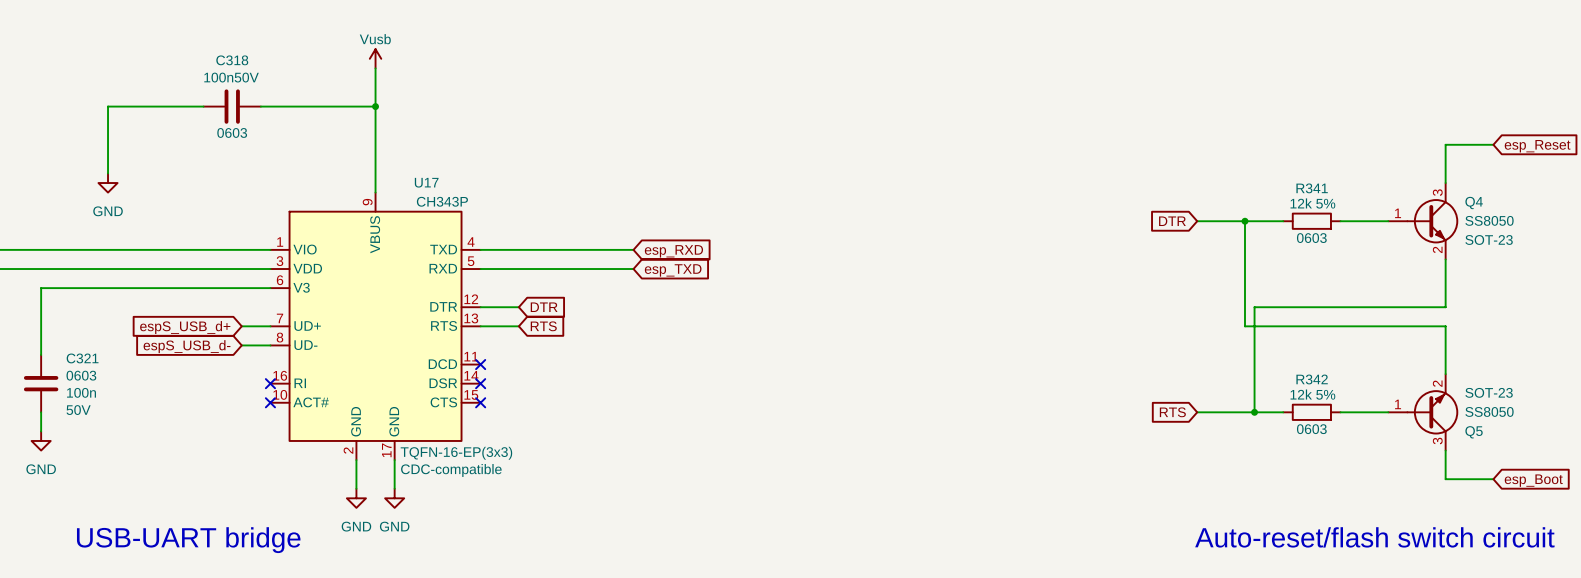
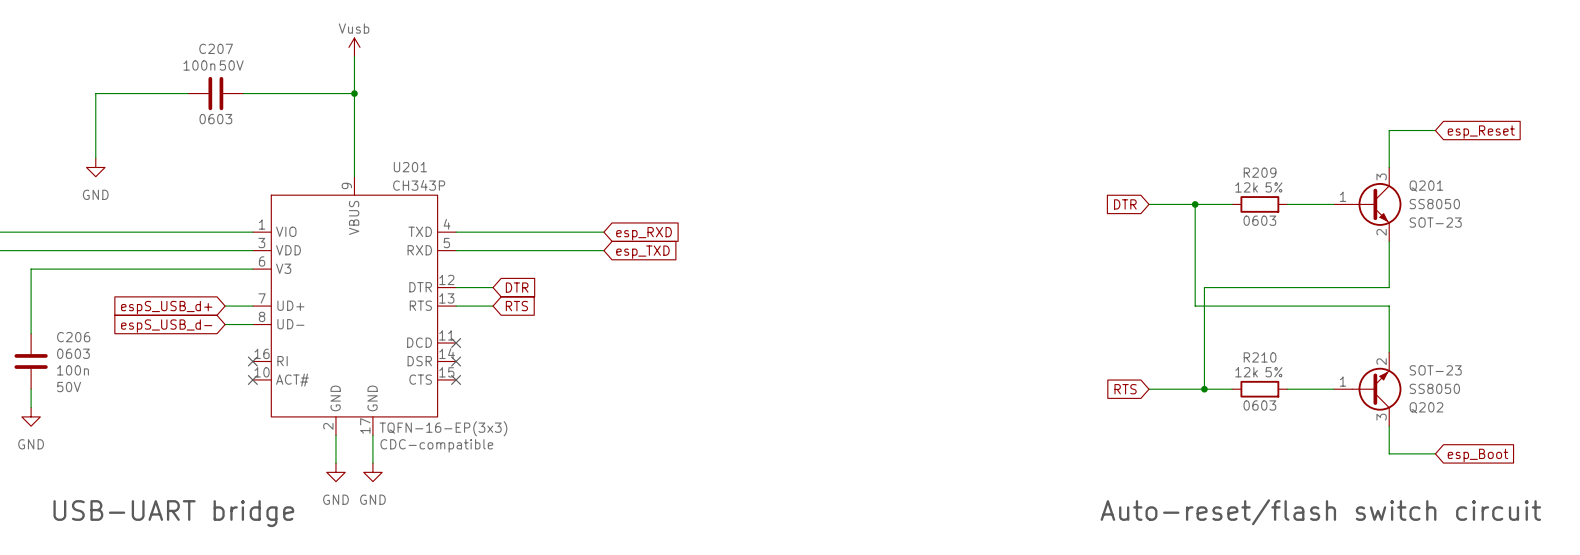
C318 name: C318 (232, 60) -> C207 (216, 48)
U17 name: U17 (426, 182) -> U201 (410, 167)
R341 name: R341 (1312, 188) -> R209 (1260, 172)
Q4 name: Q4 (1474, 203) -> Q201 (1426, 186)
C321 name: C321 (82, 358) -> C206 (73, 337)
R342 name: R342 (1312, 379) -> R210 (1260, 357)
Q5 name: Q5 (1474, 432) -> Q202 (1426, 407)

